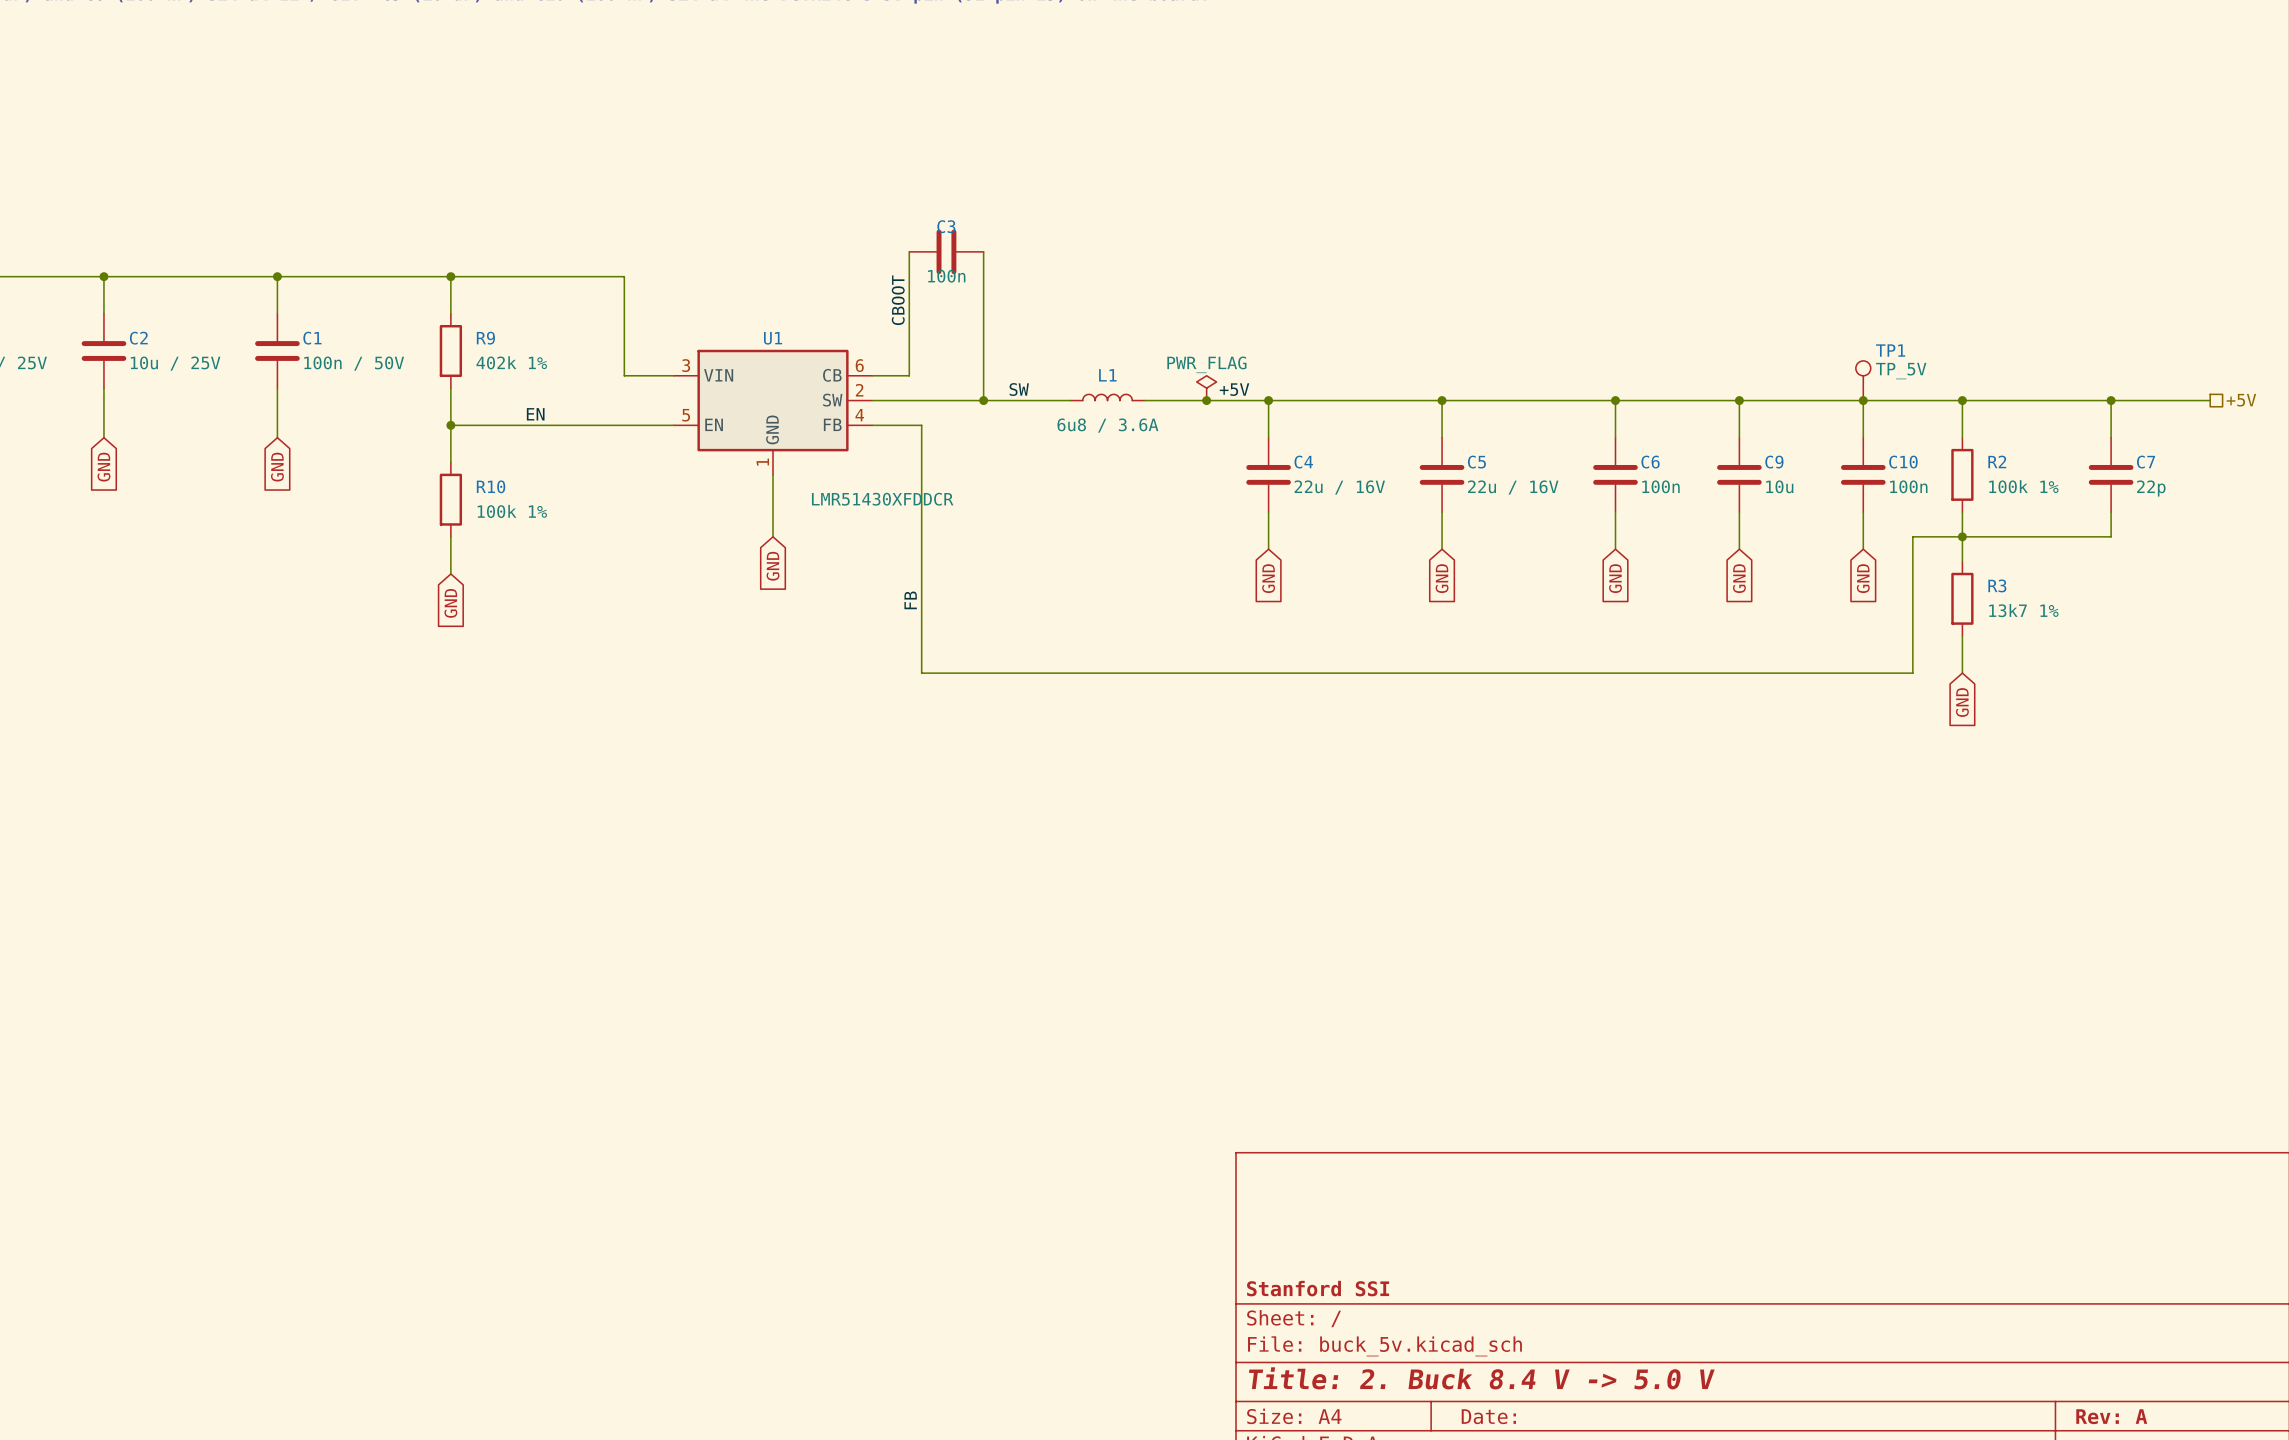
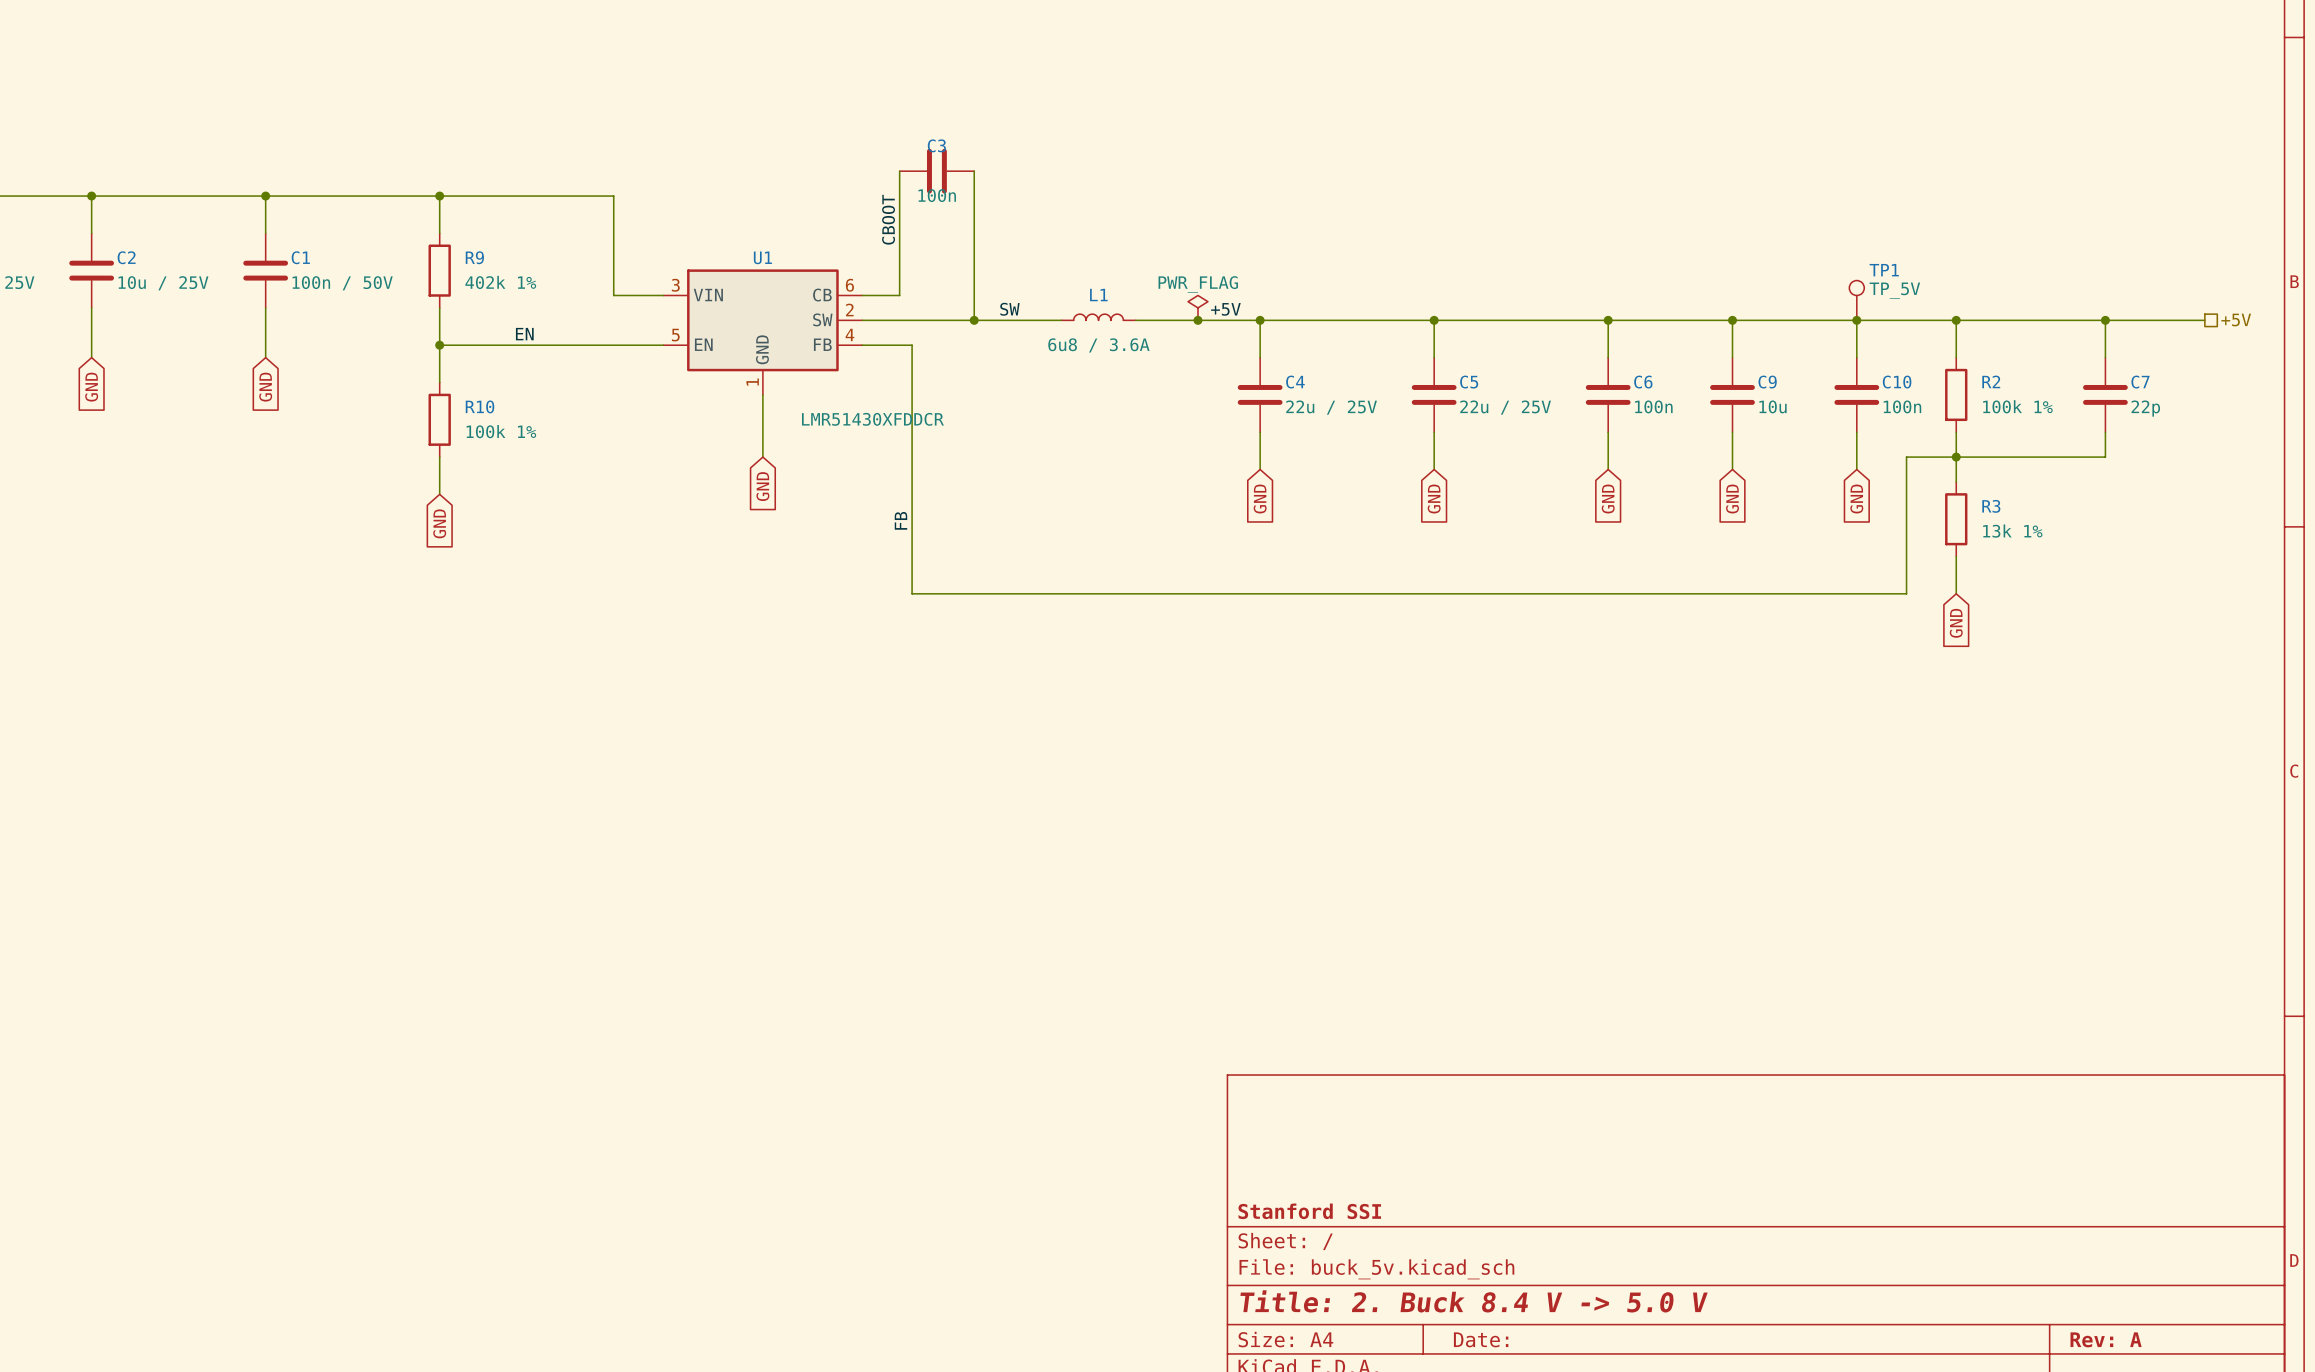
C4 value: 22u / 16V (1339, 487) -> 22u / 25V (1331, 407)
C5 value: 22u / 16V (1513, 487) -> 22u / 25V (1505, 407)
R3 value: 13k7 1% (2023, 610) -> 13k 1% (2012, 531)

